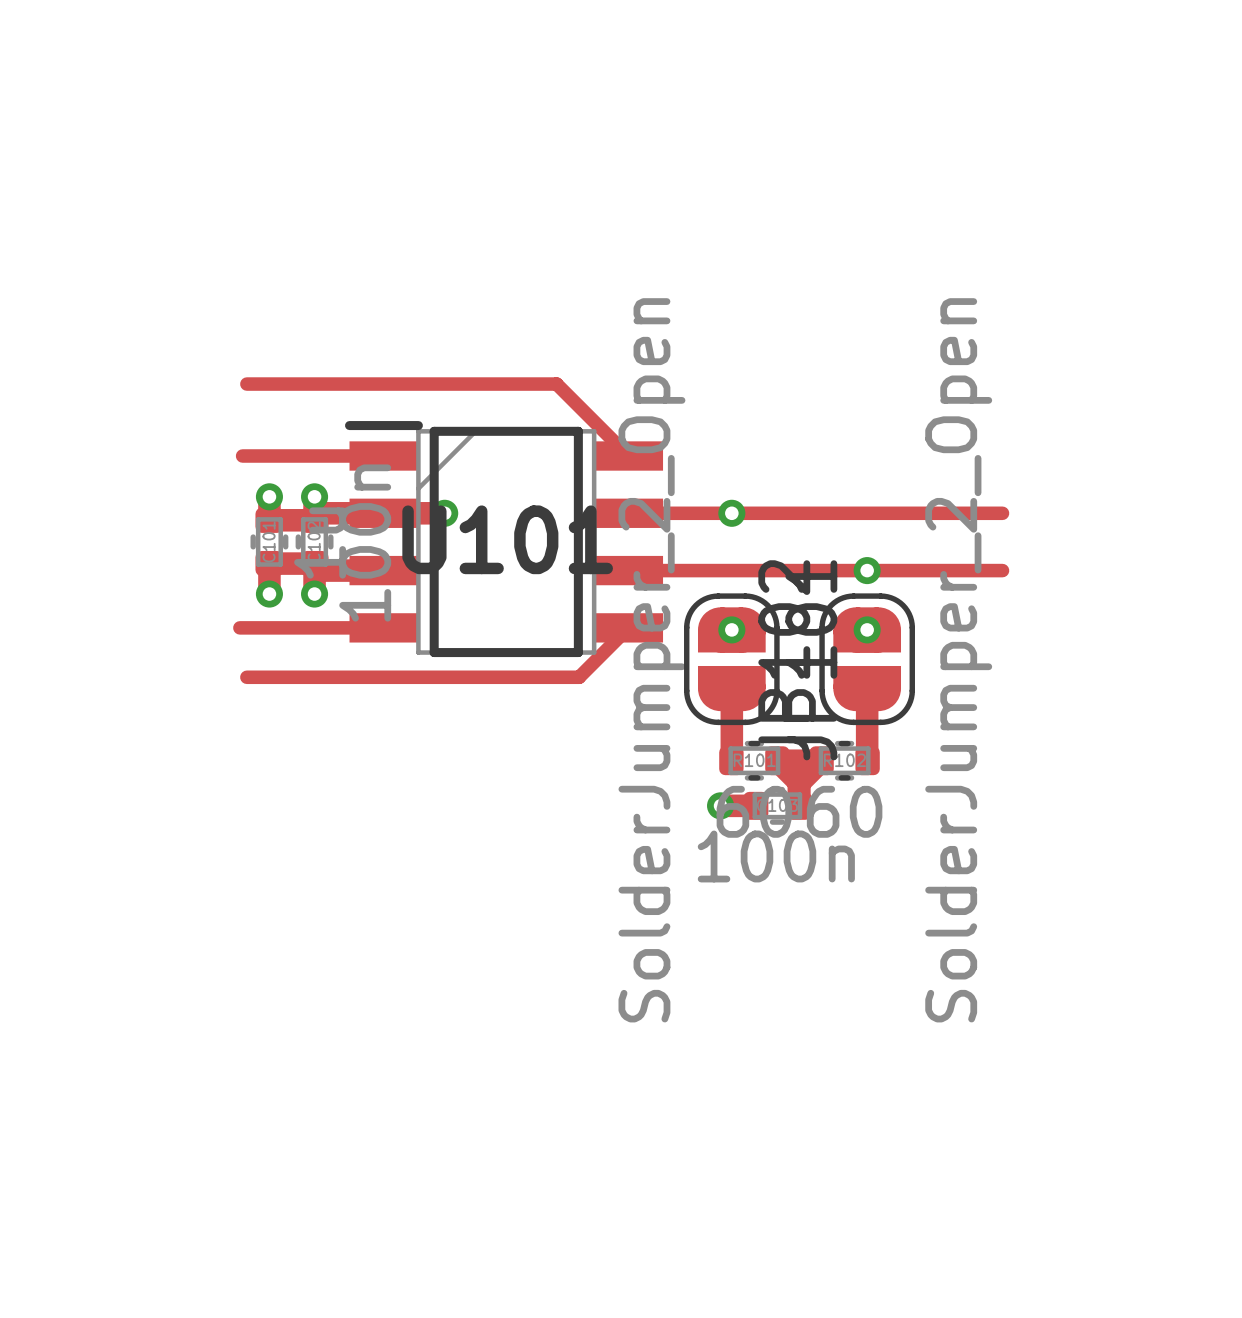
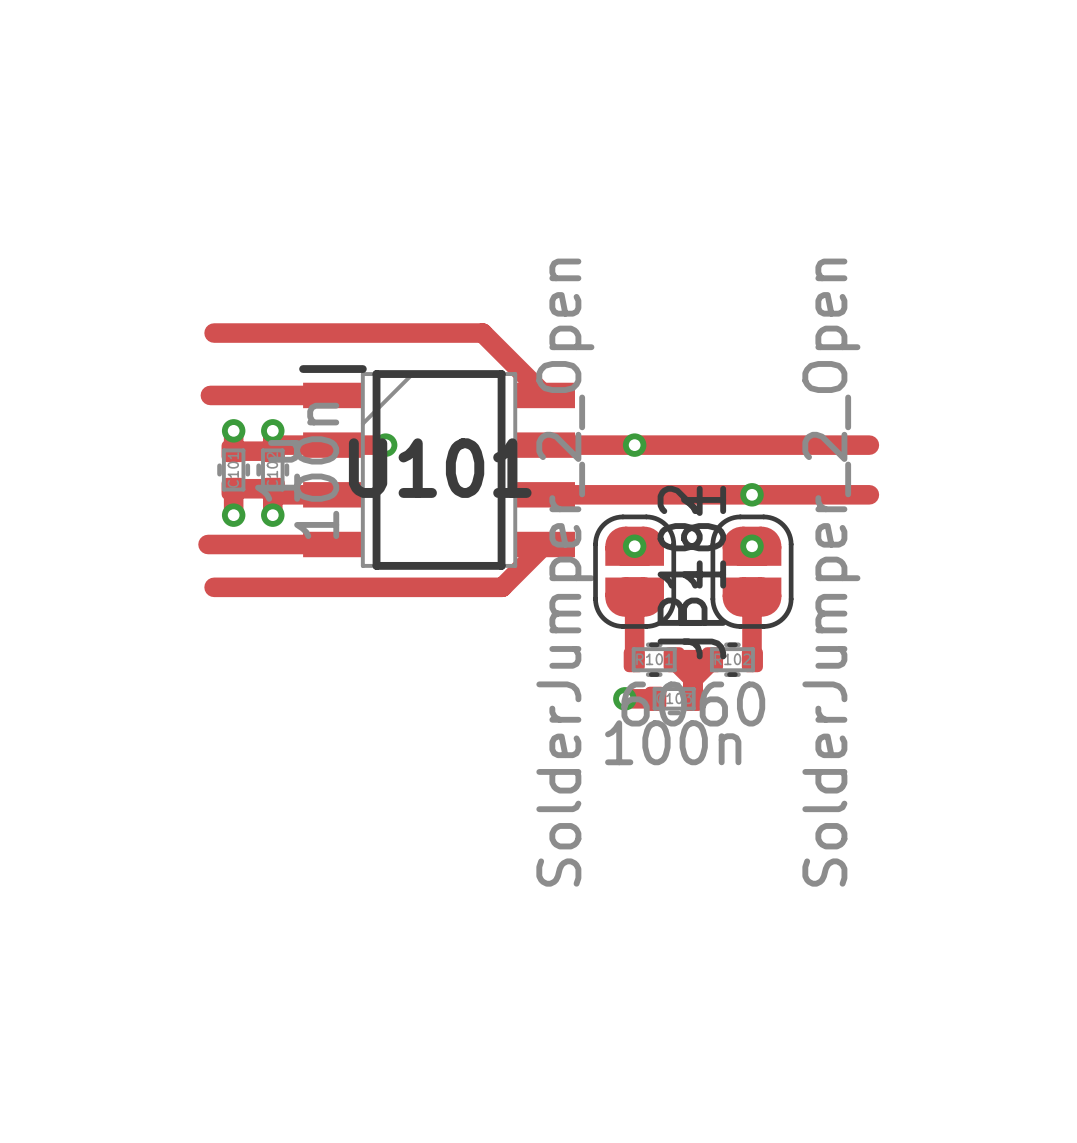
track width: thin (246, 384) (556, 384) (628, 456) -> thick (214, 333) (482, 333) (545, 395)
track width: thin (242, 456) (383, 456) -> thick (210, 395) (332, 395)
track width: thin (628, 513) (1002, 513) -> thick (545, 445) (869, 445)
track width: thin (628, 570) (1002, 570) -> thick (545, 494) (869, 494)
track width: thin (239, 627) (383, 627) -> thick (208, 544) (332, 544)
track width: thin (628, 627) (579, 677) (246, 677) -> thick (545, 544) (502, 587) (214, 587)

